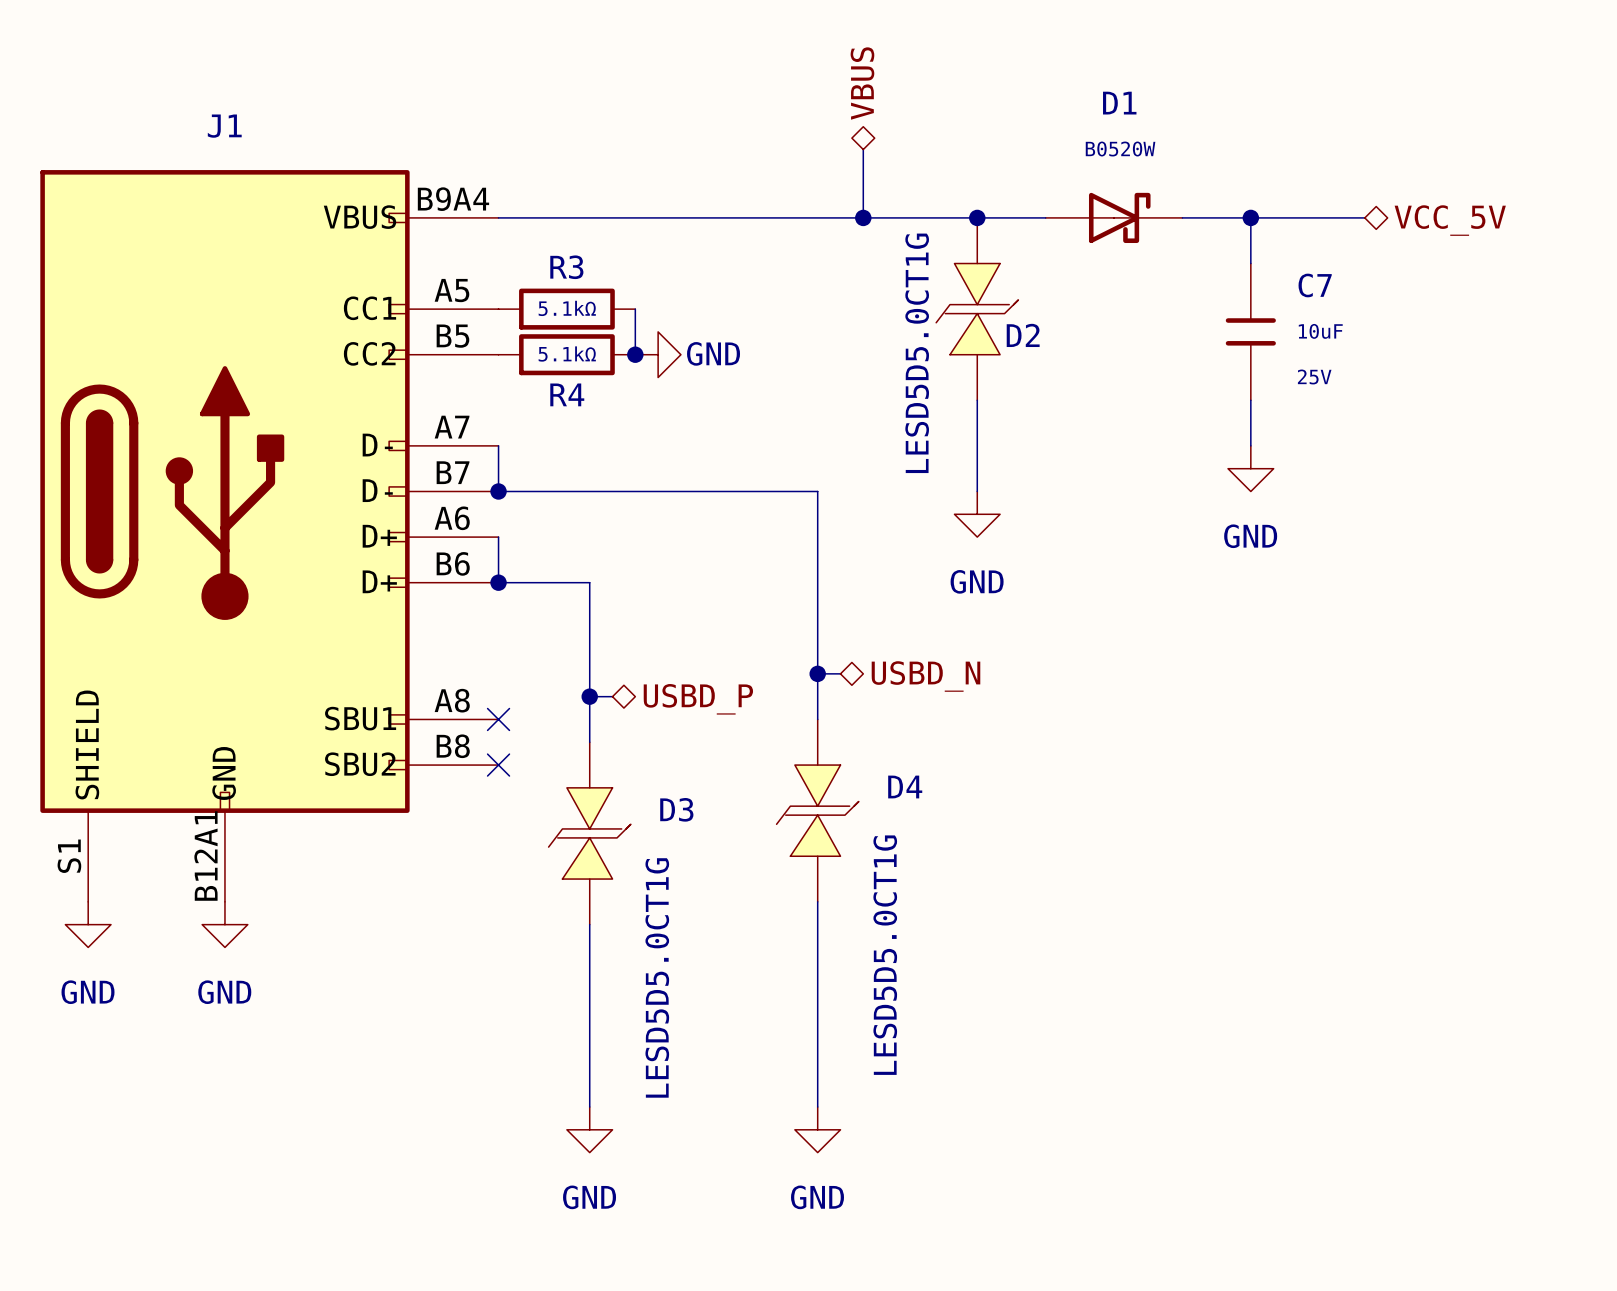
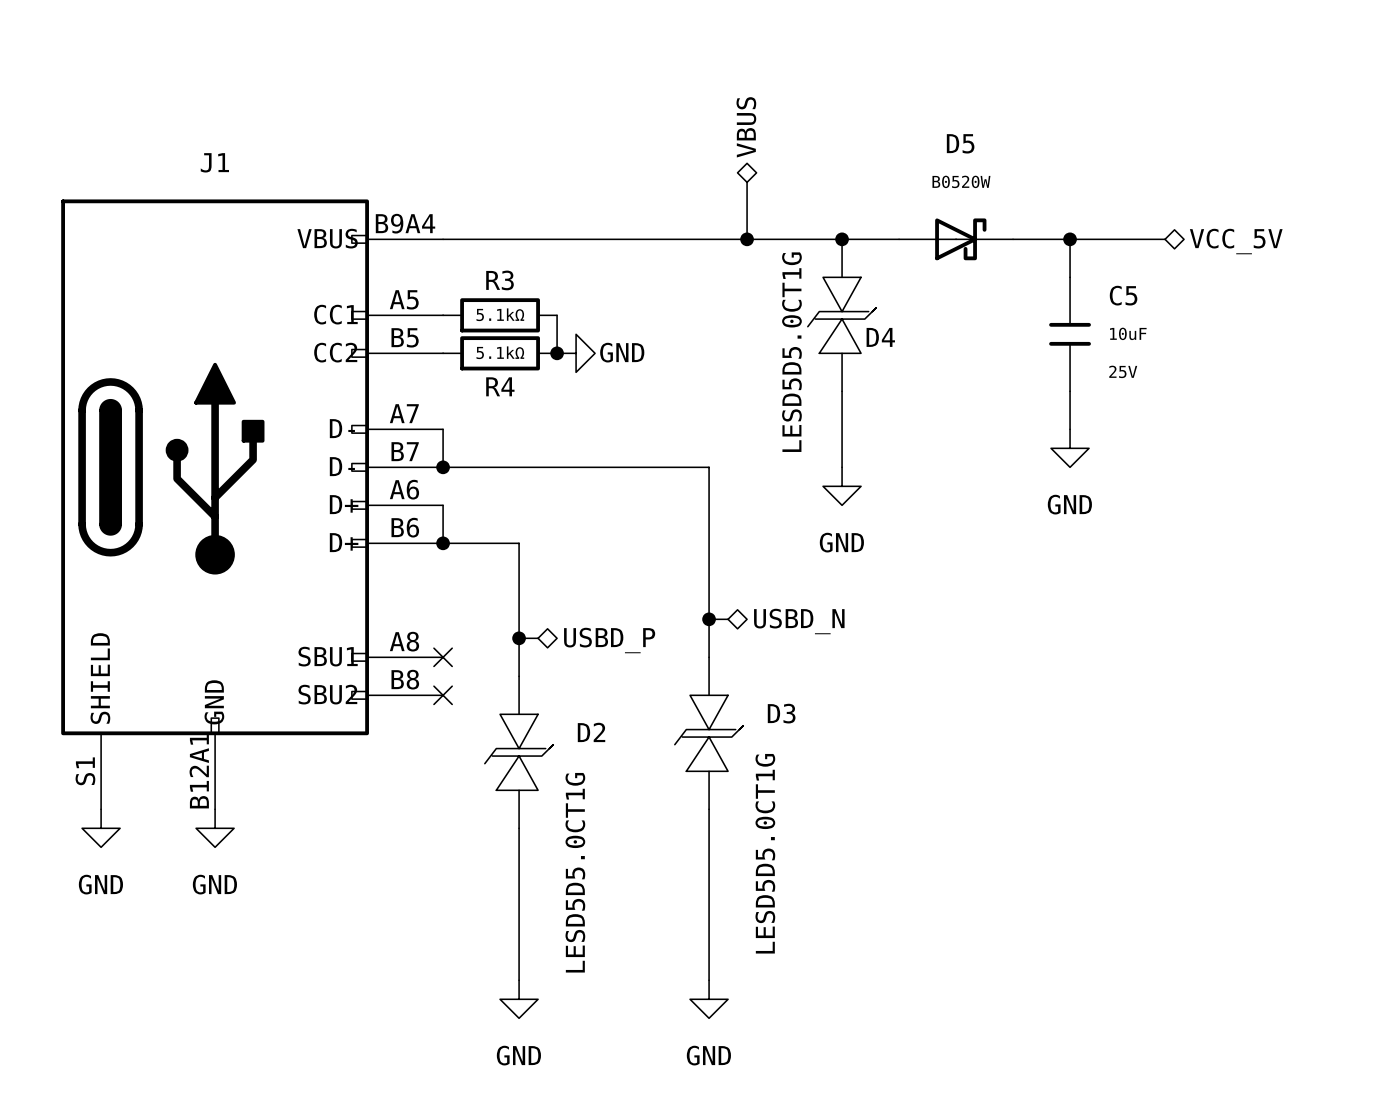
D1 name: D1 (1119, 103) -> D5 (960, 143)
C7 name: C7 (1315, 285) -> C5 (1123, 295)
D2 name: D2 (1023, 335) -> D4 (880, 337)
D4 name: D4 (905, 787) -> D3 (781, 713)
D3 name: D3 (676, 809) -> D2 (591, 732)

